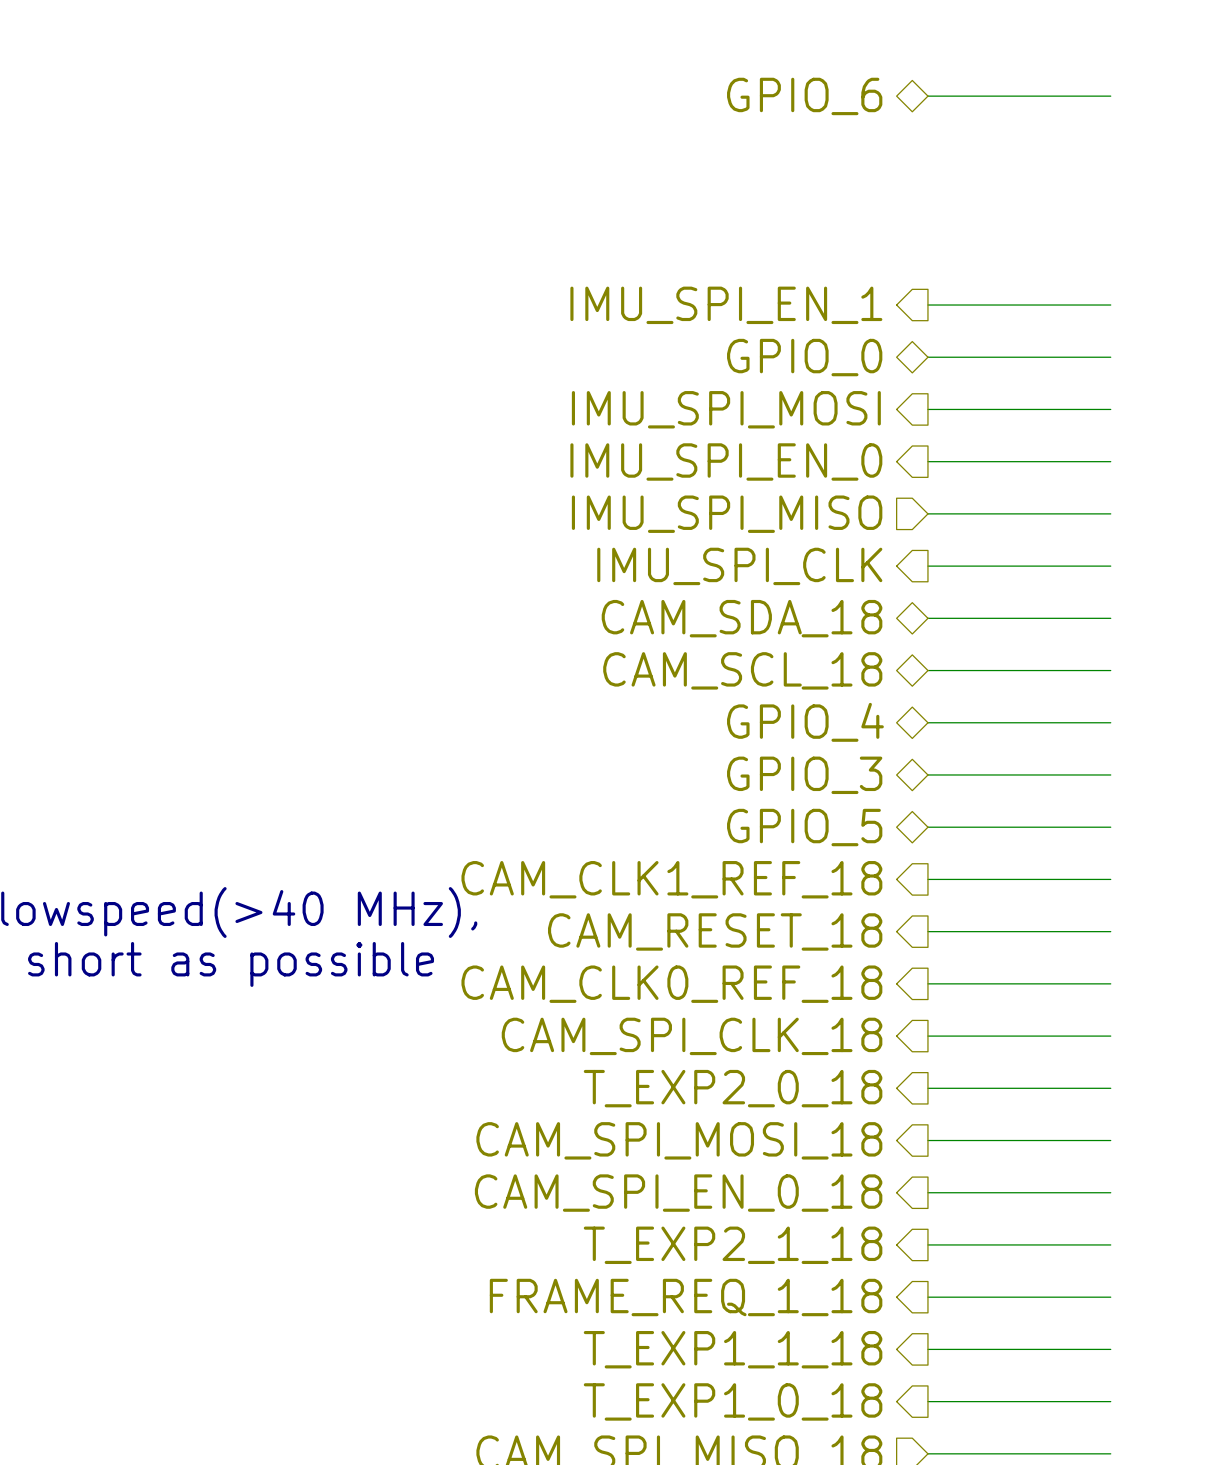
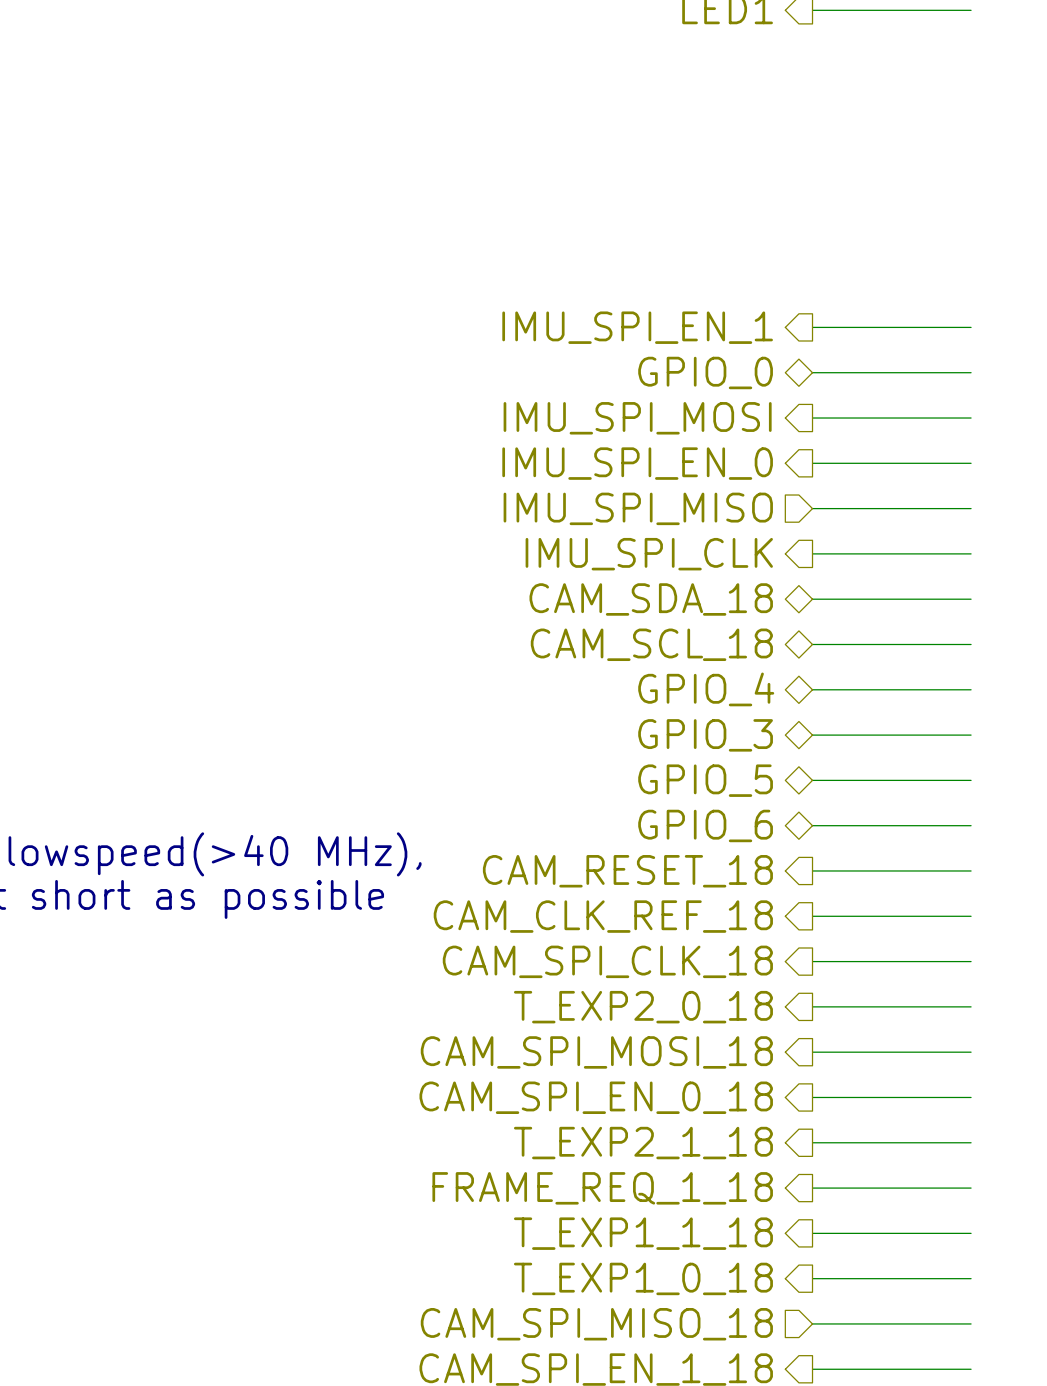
hierarchical label: GPIO_6 (804, 96) -> none
wire: (927, 96) (1110, 96) -> none
hierarchical label shape: output (671, 879) -> bidirectional (705, 825)
hierarchical label: CAM_CLK1_REF_18 (671, 879) -> GPIO_6 (705, 825)
hierarchical label: CAM_CLK0_REF_18 (671, 984) -> CAM_CLK_REF_18 (603, 916)

